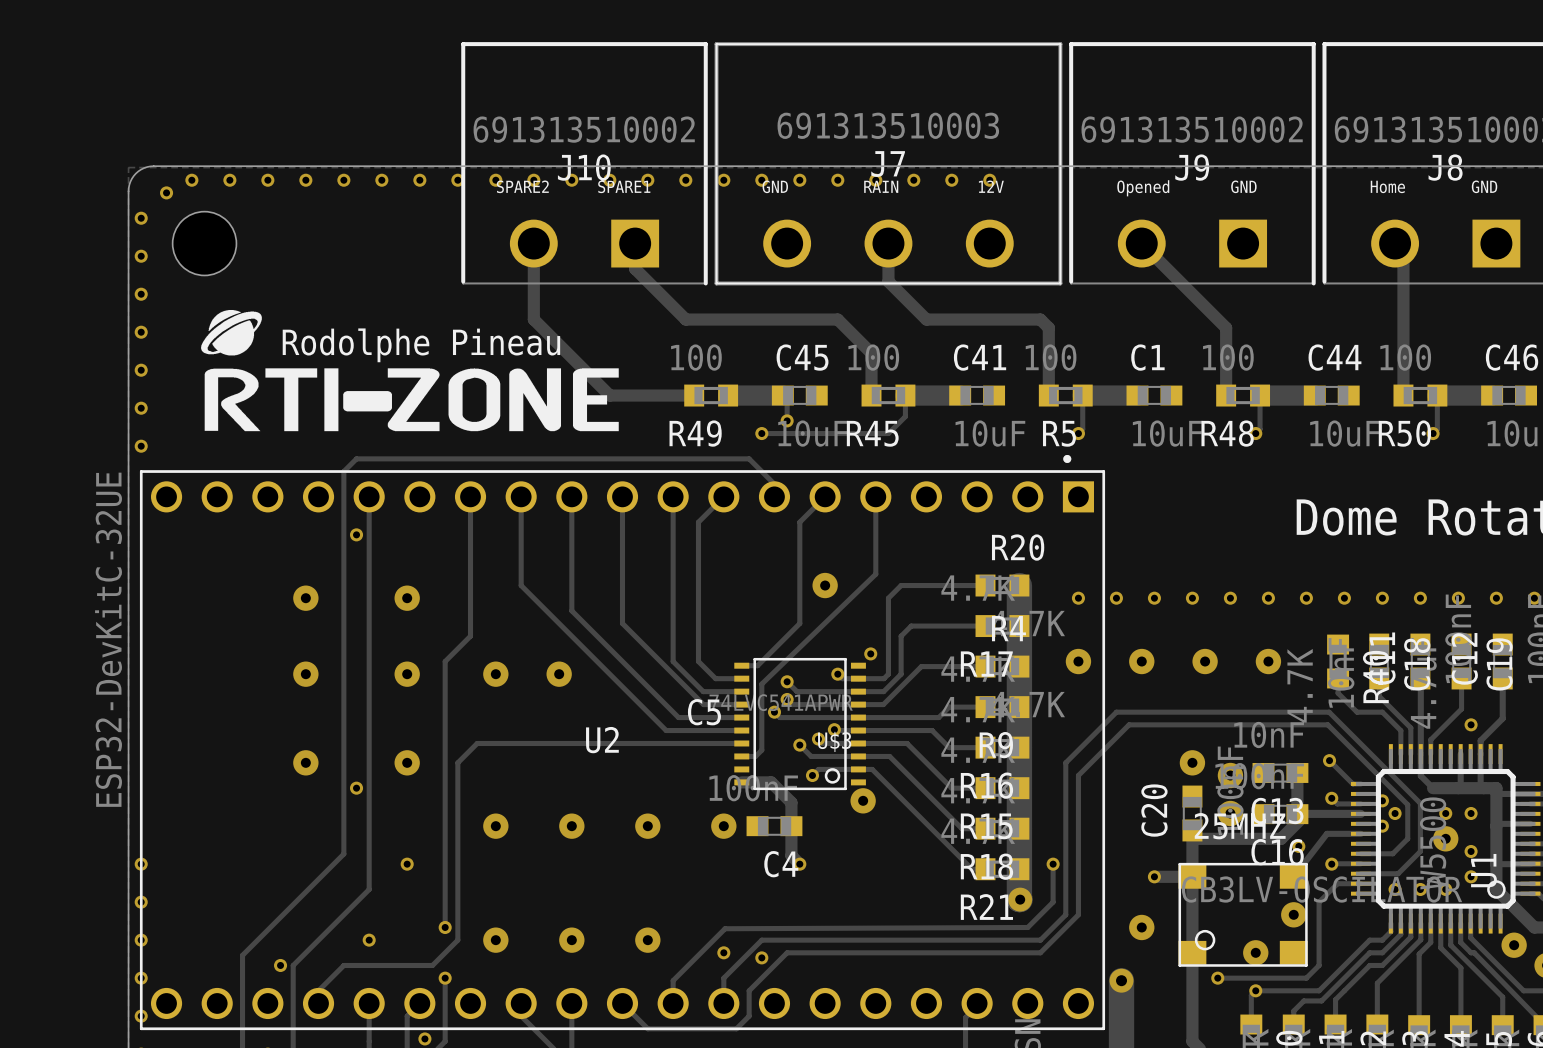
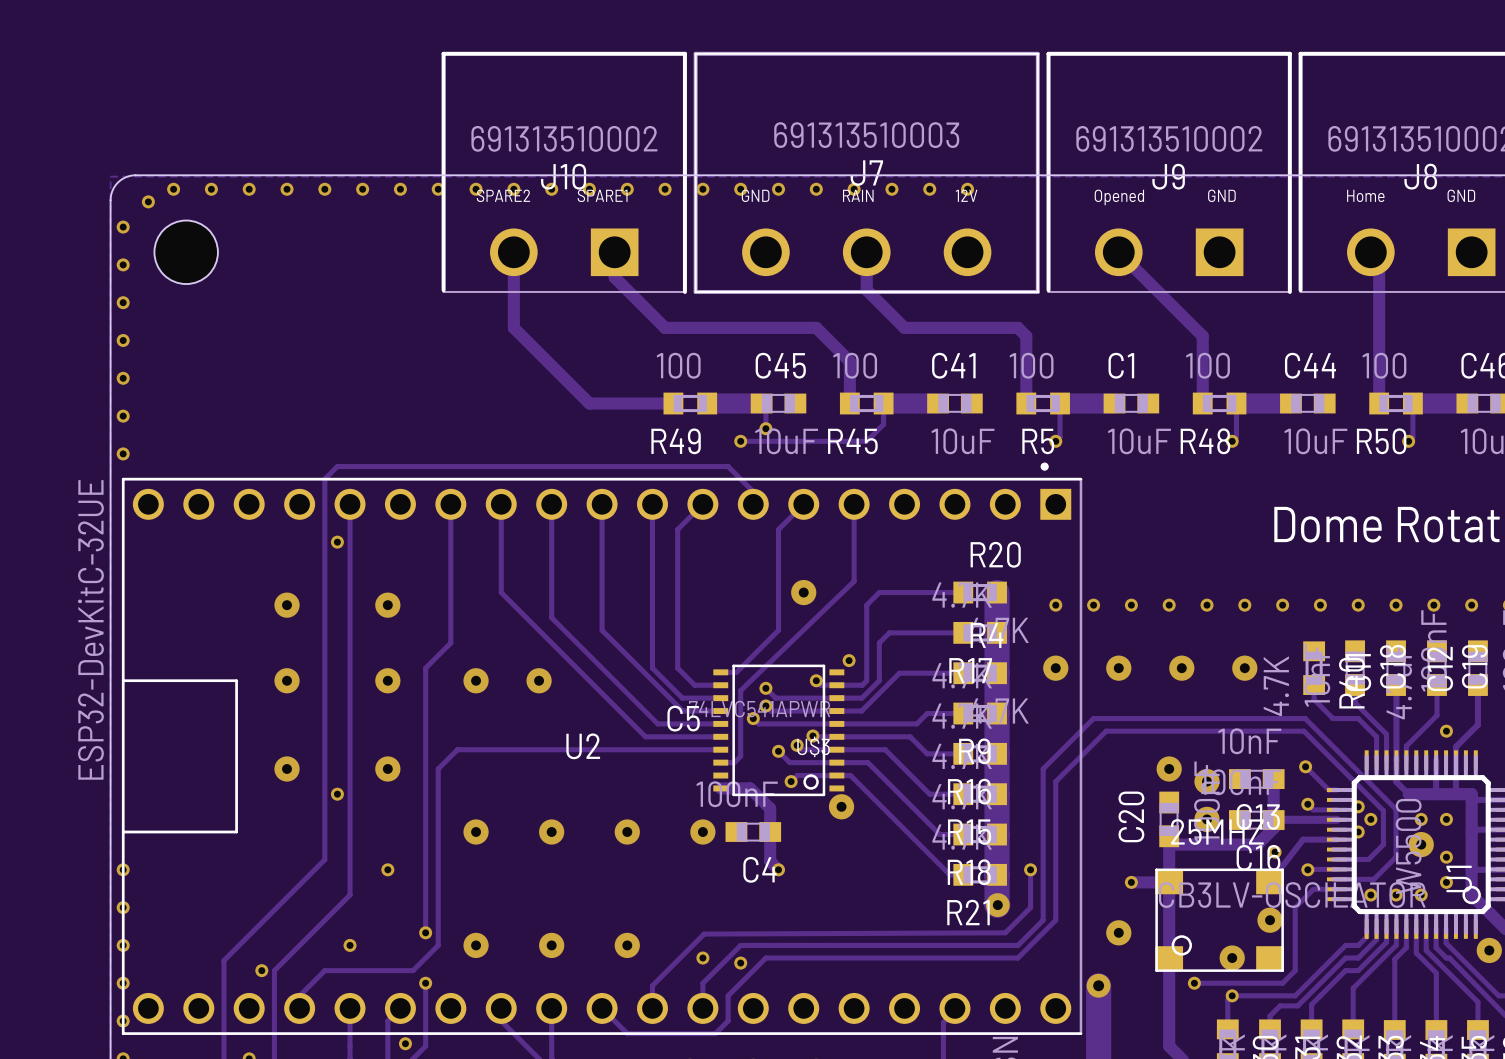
drawing: [201, 309, 619, 432] -> none
U2 footprint: [139, 454, 1106, 1031] -> [121, 462, 1083, 1035]

